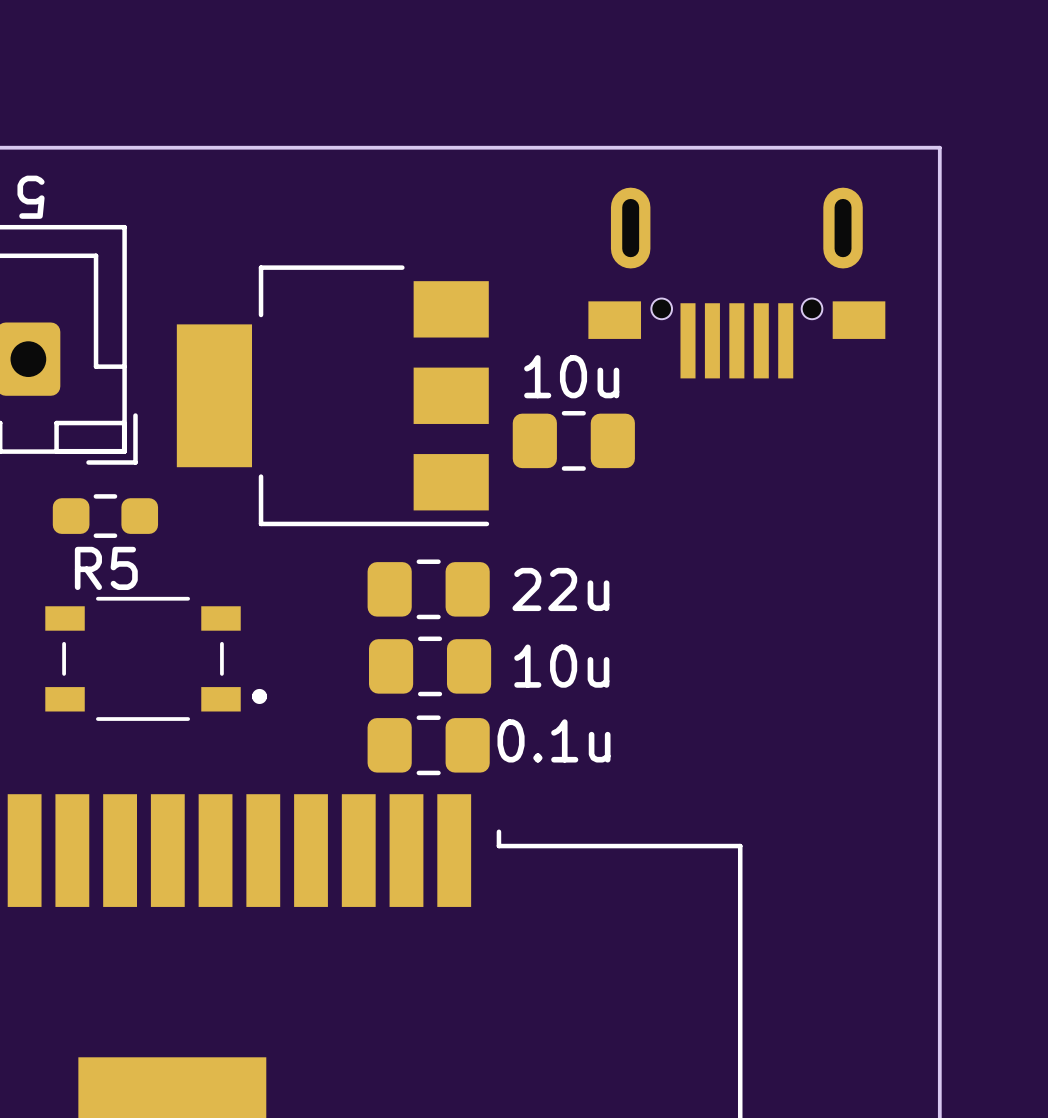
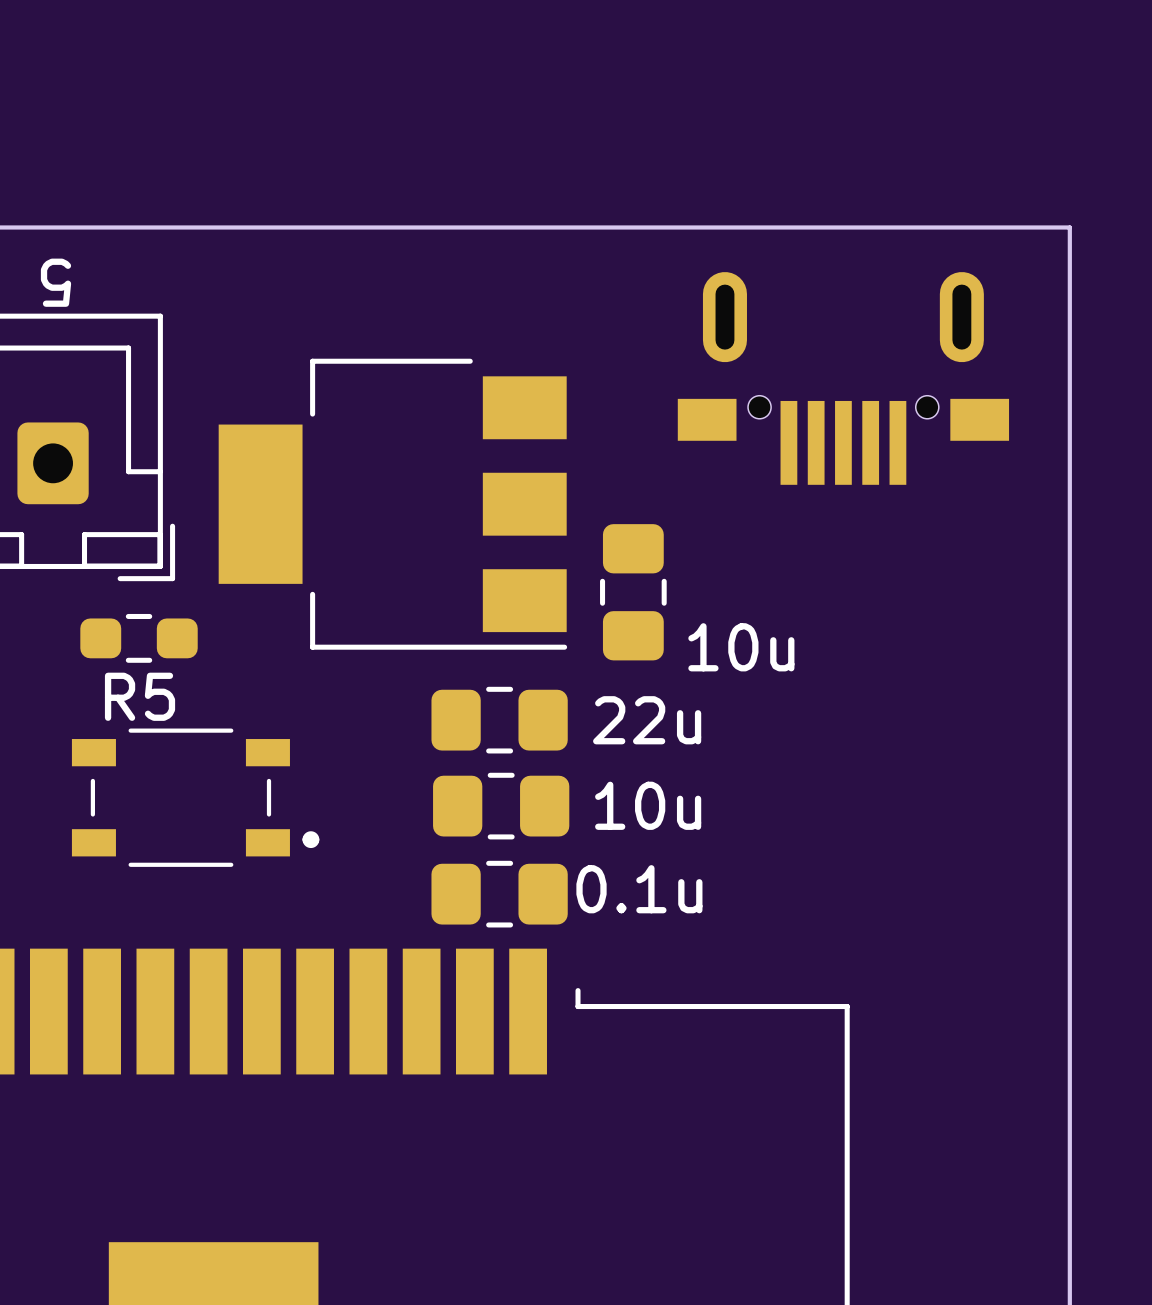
part rotation: 0° (573, 440) -> 90° clockwise (633, 592)

